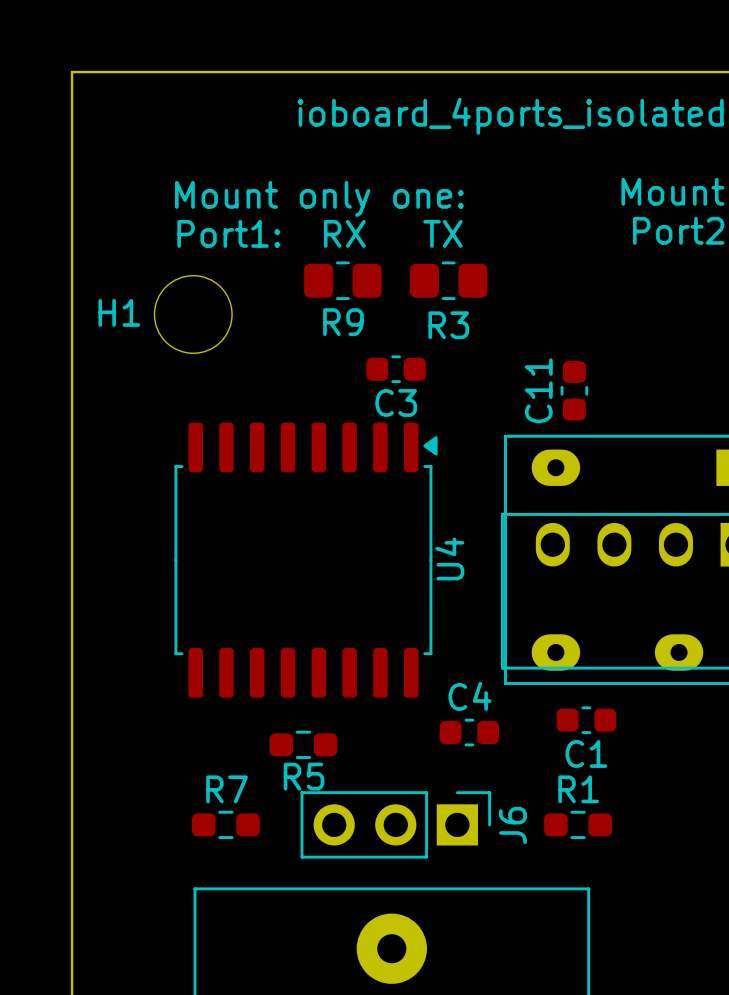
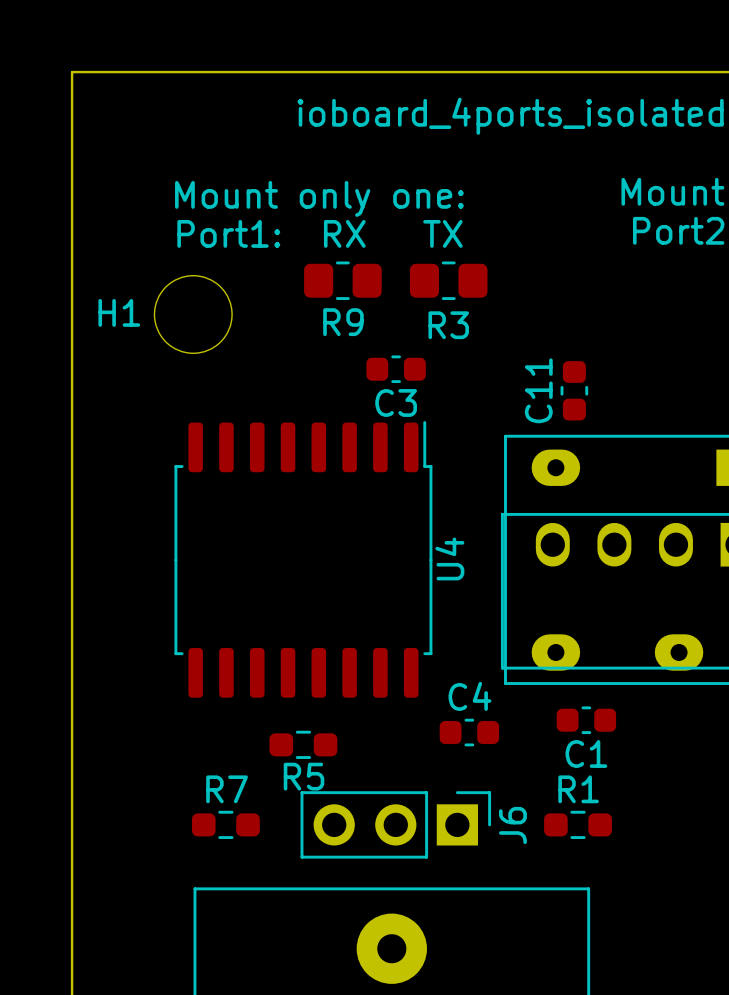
U4 footprint: [174, 422, 438, 698] -> [174, 421, 433, 698]

